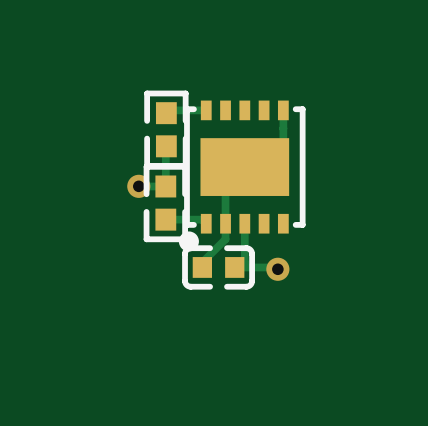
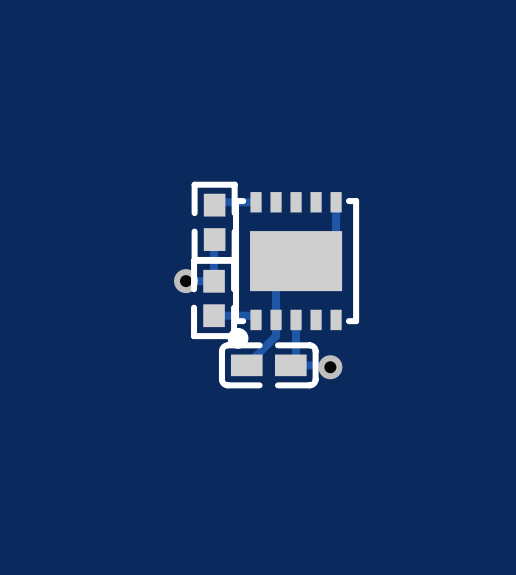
part footprint: [182, 245, 255, 290] -> [218, 342, 319, 389]

